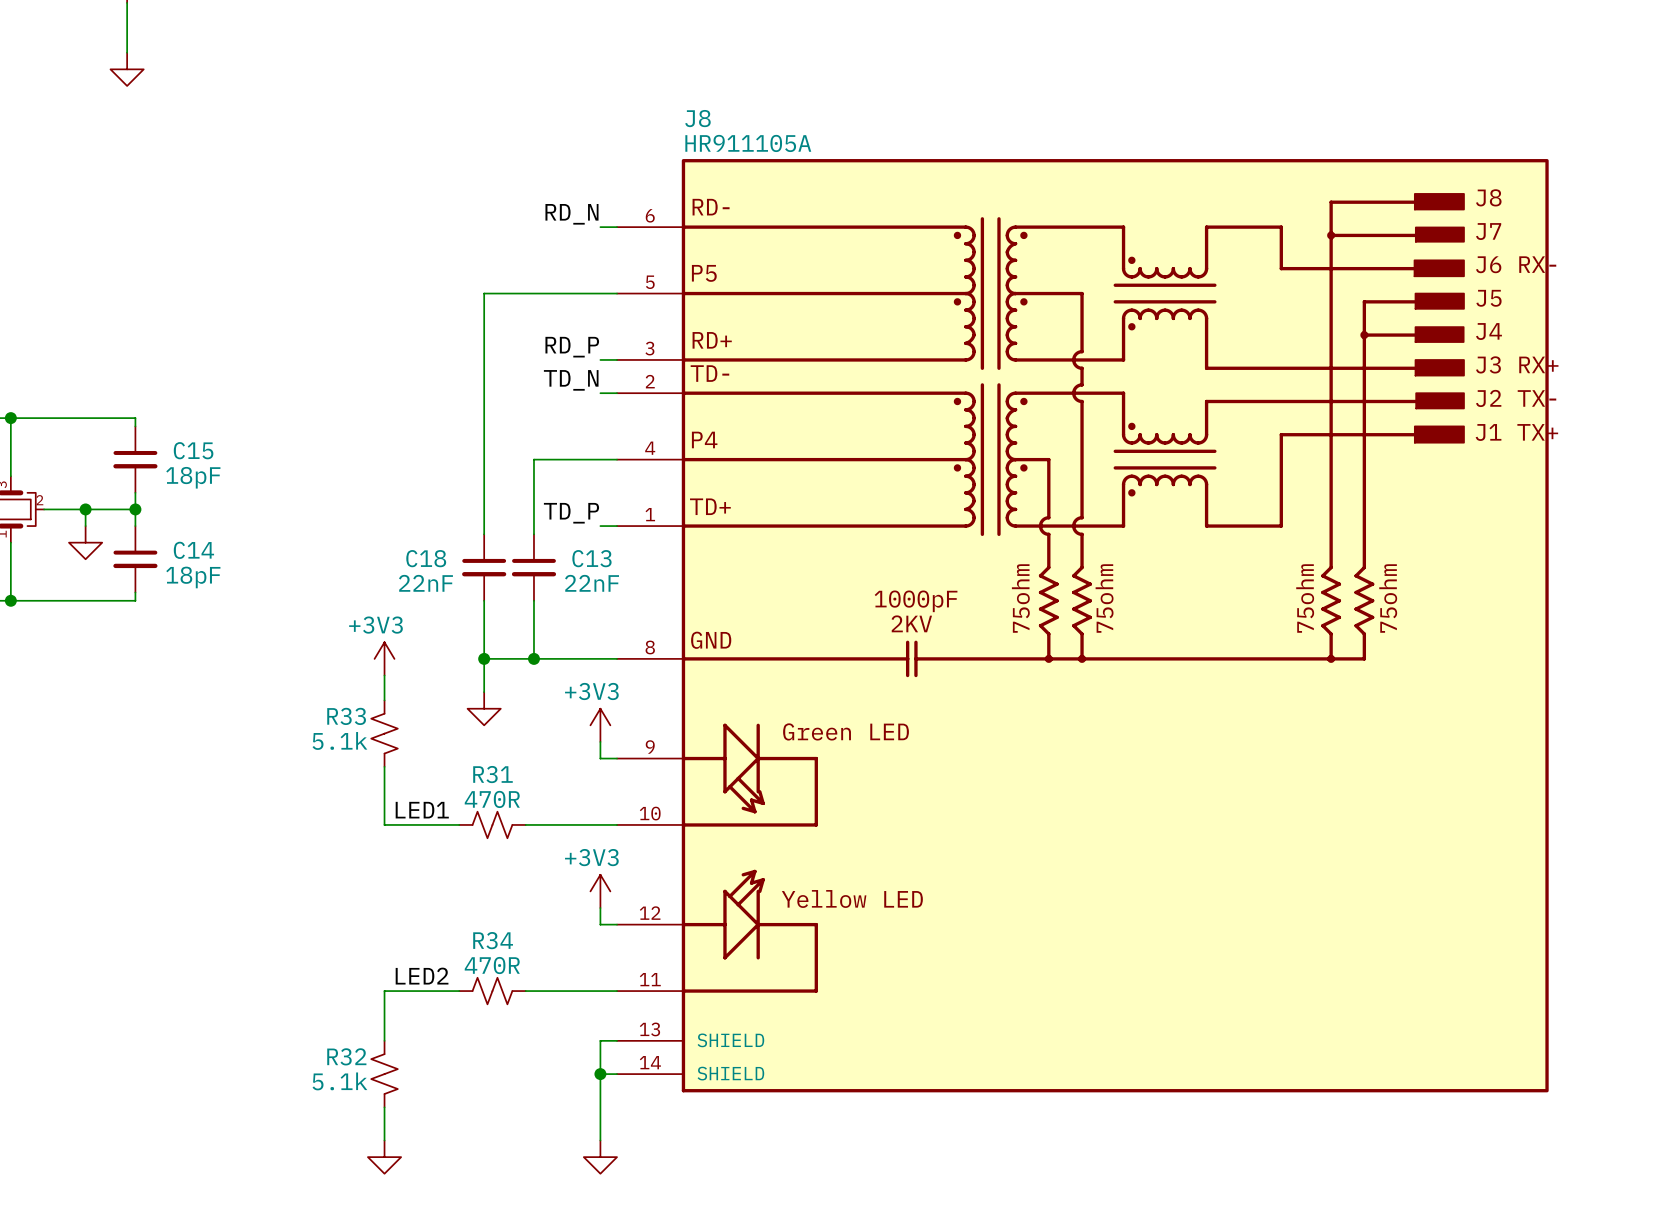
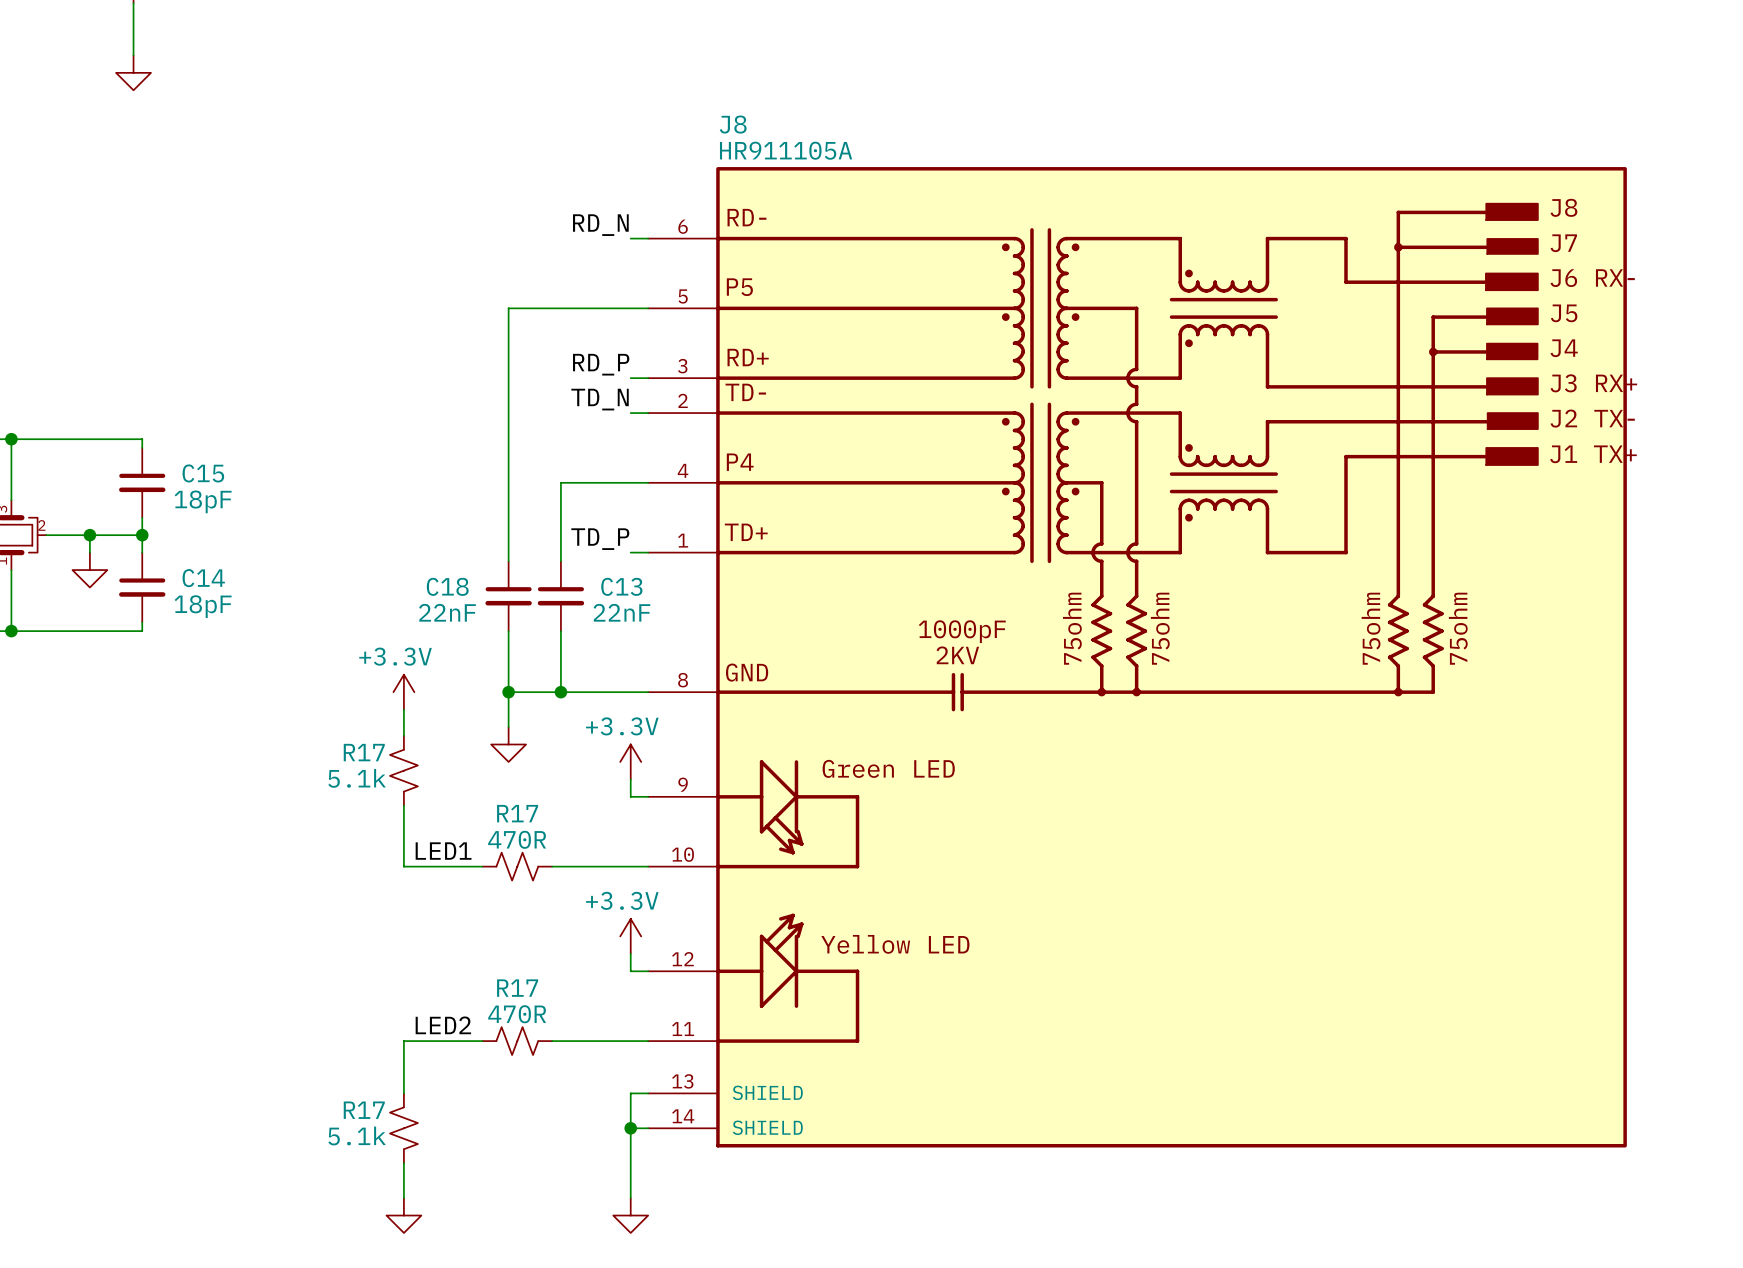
power symbol: +3V3 (384, 658) -> +3.3V (403, 692)
R33 name: R33 (346, 716) -> R17 (364, 752)
power symbol: +3V3 (600, 725) -> +3.3V (630, 761)
R31 name: R31 (492, 774) -> R17 (517, 813)
power symbol: +3V3 (600, 891) -> +3.3V (630, 936)
R34 name: R34 (493, 940) -> R17 (517, 988)
R32 name: R32 (346, 1056) -> R17 (364, 1110)

